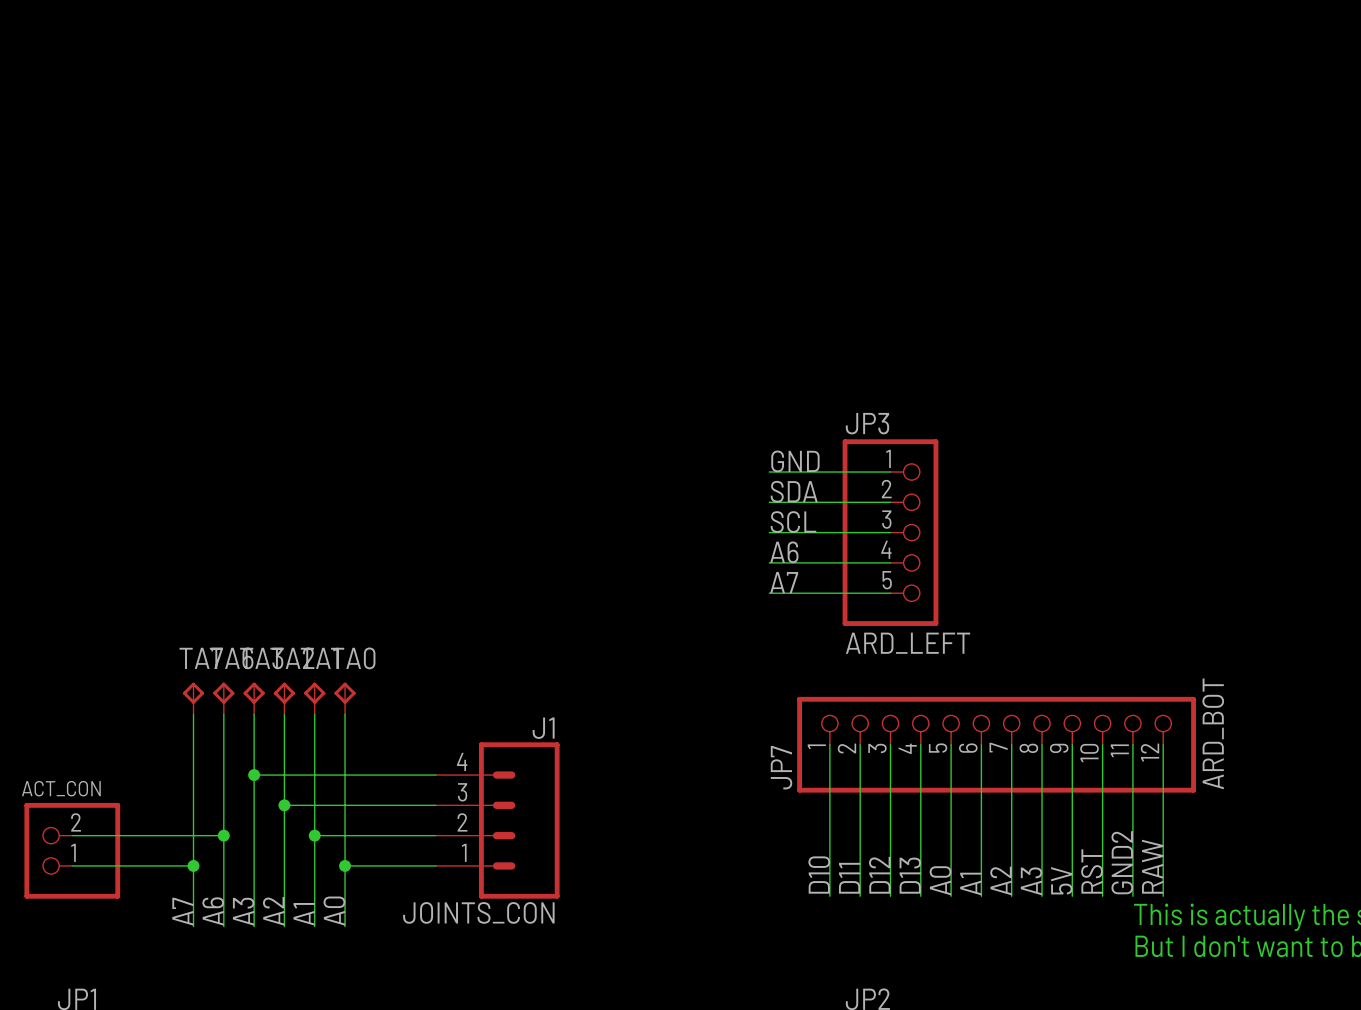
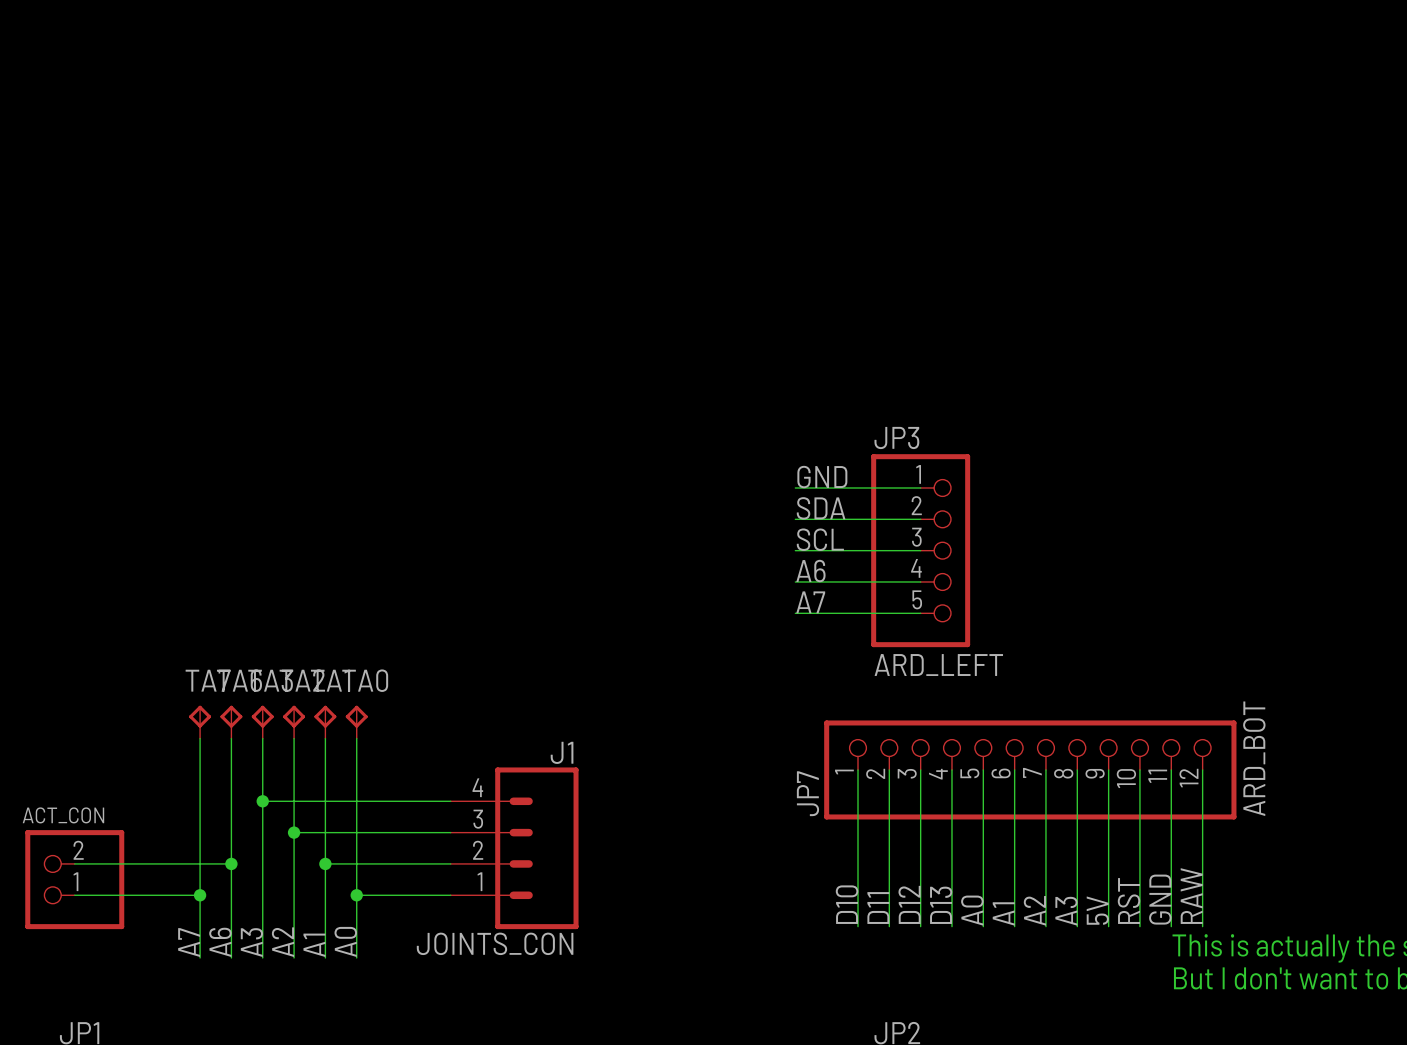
label: GND2 (1122, 862) -> GND (1160, 899)

